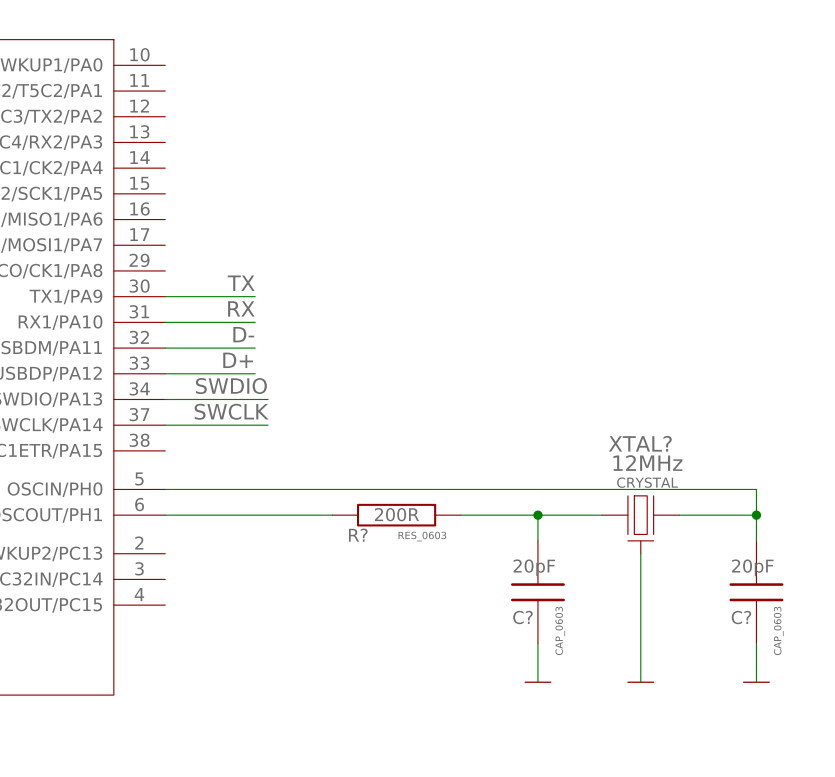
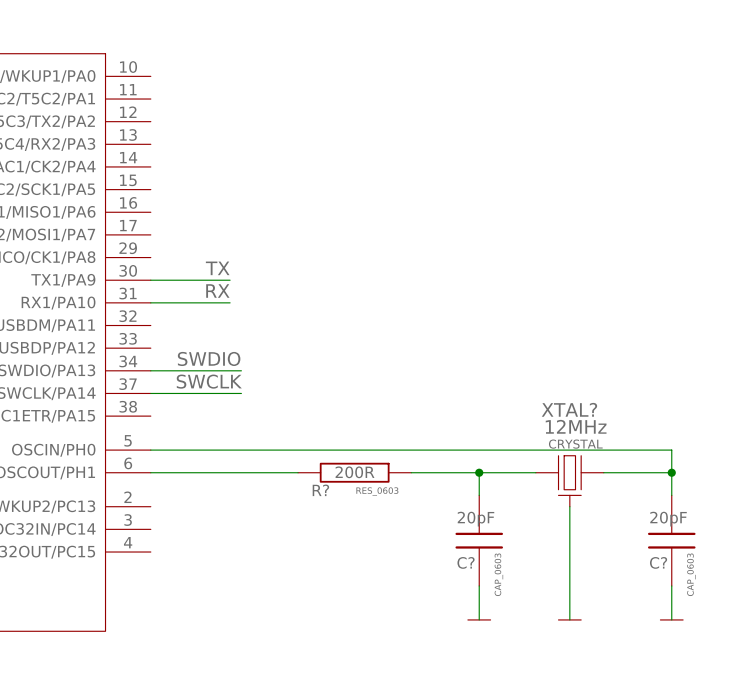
label: D- (243, 334) -> none
wire: (165, 348) (255, 348) -> none
label: D+ (238, 360) -> none
wire: (165, 373) (255, 373) -> none

